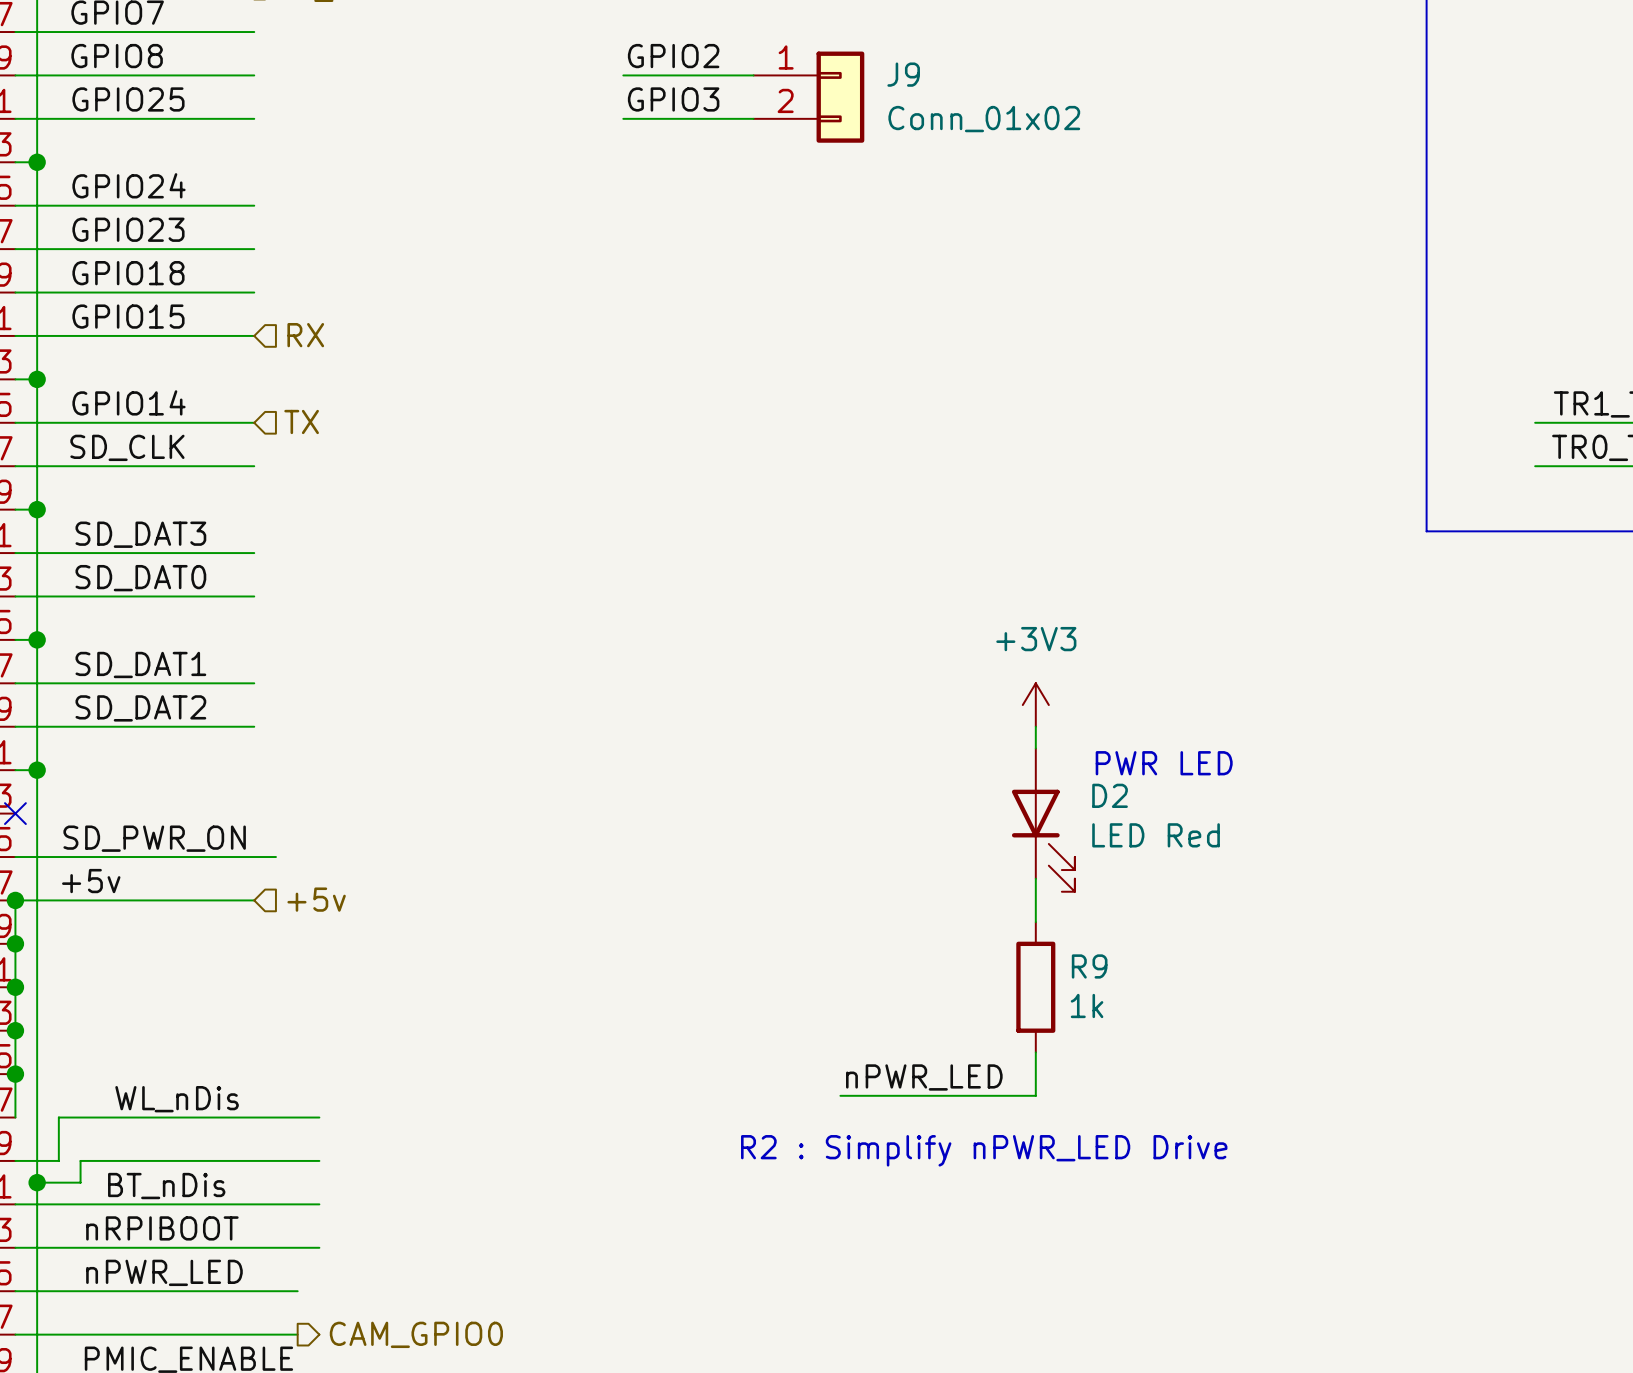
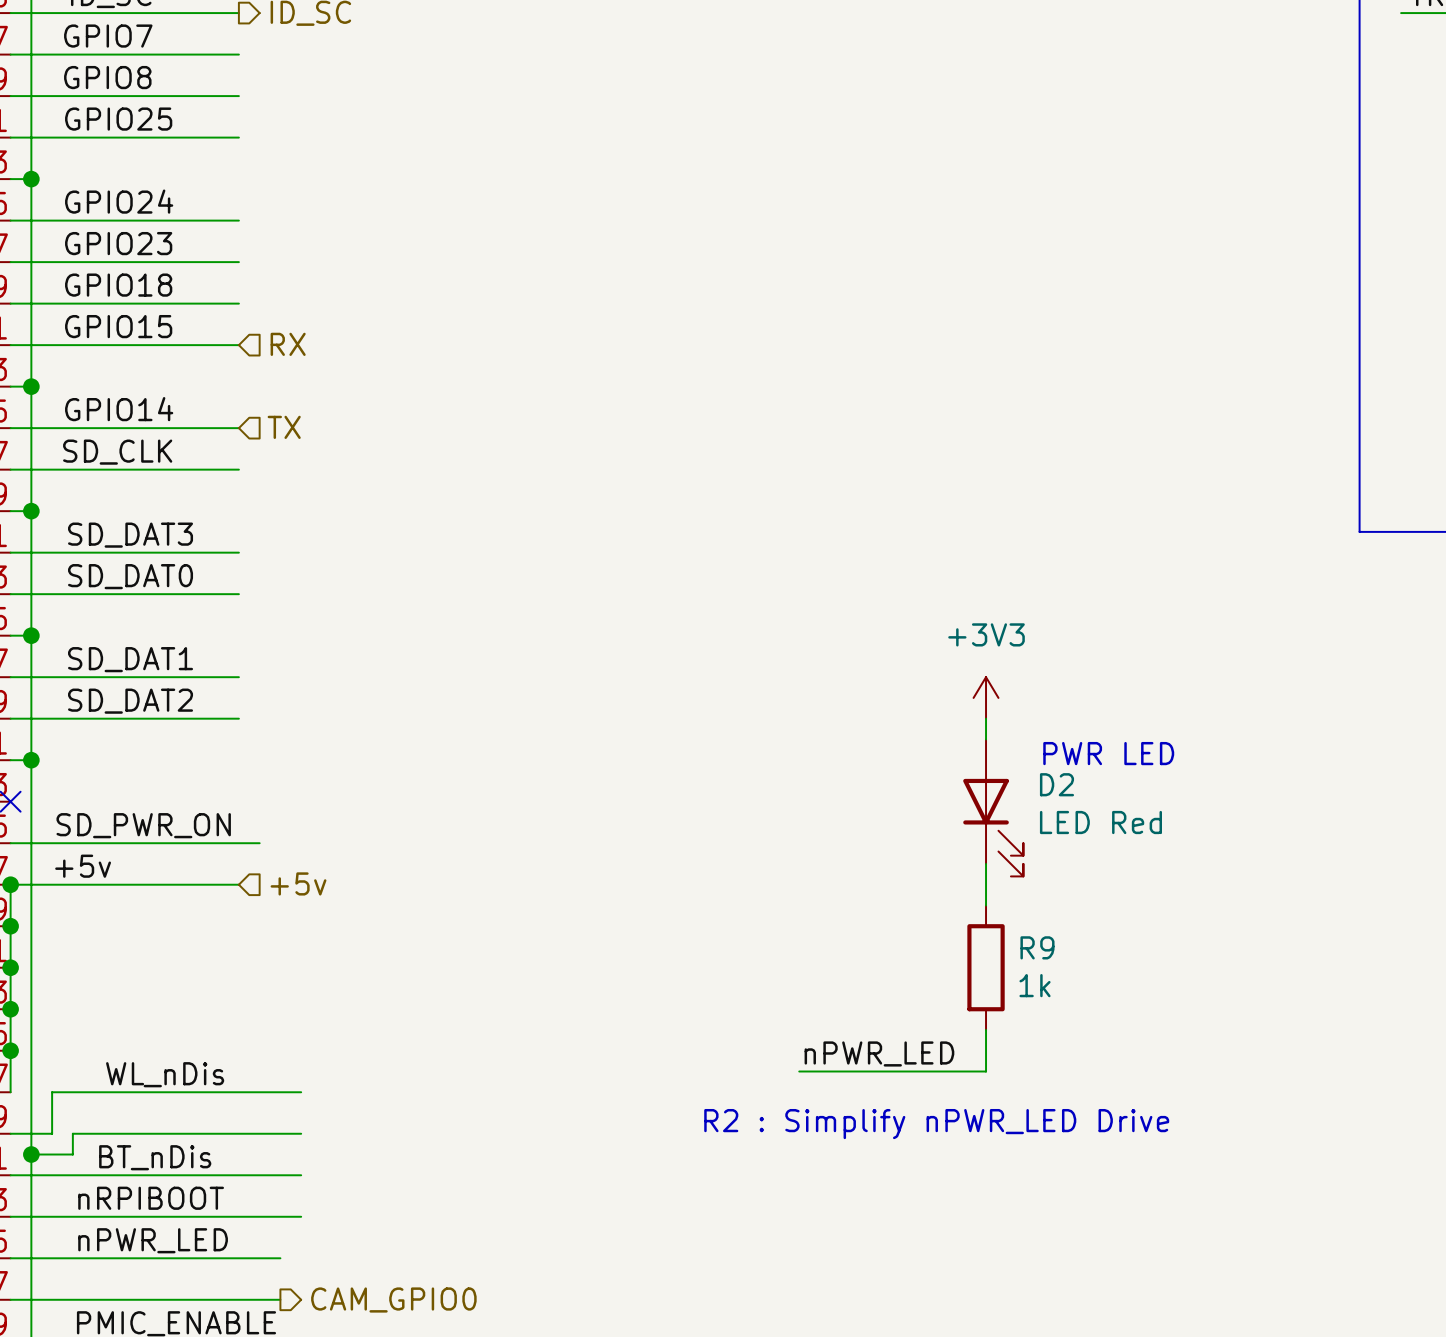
label: GPIO2 (673, 56) -> none
wire: (623, 75) (753, 75) -> none
J9: Conn_01x02 (808, 97) -> none
label: GPIO3 (673, 99) -> none
wire: (623, 118) (753, 118) -> none

